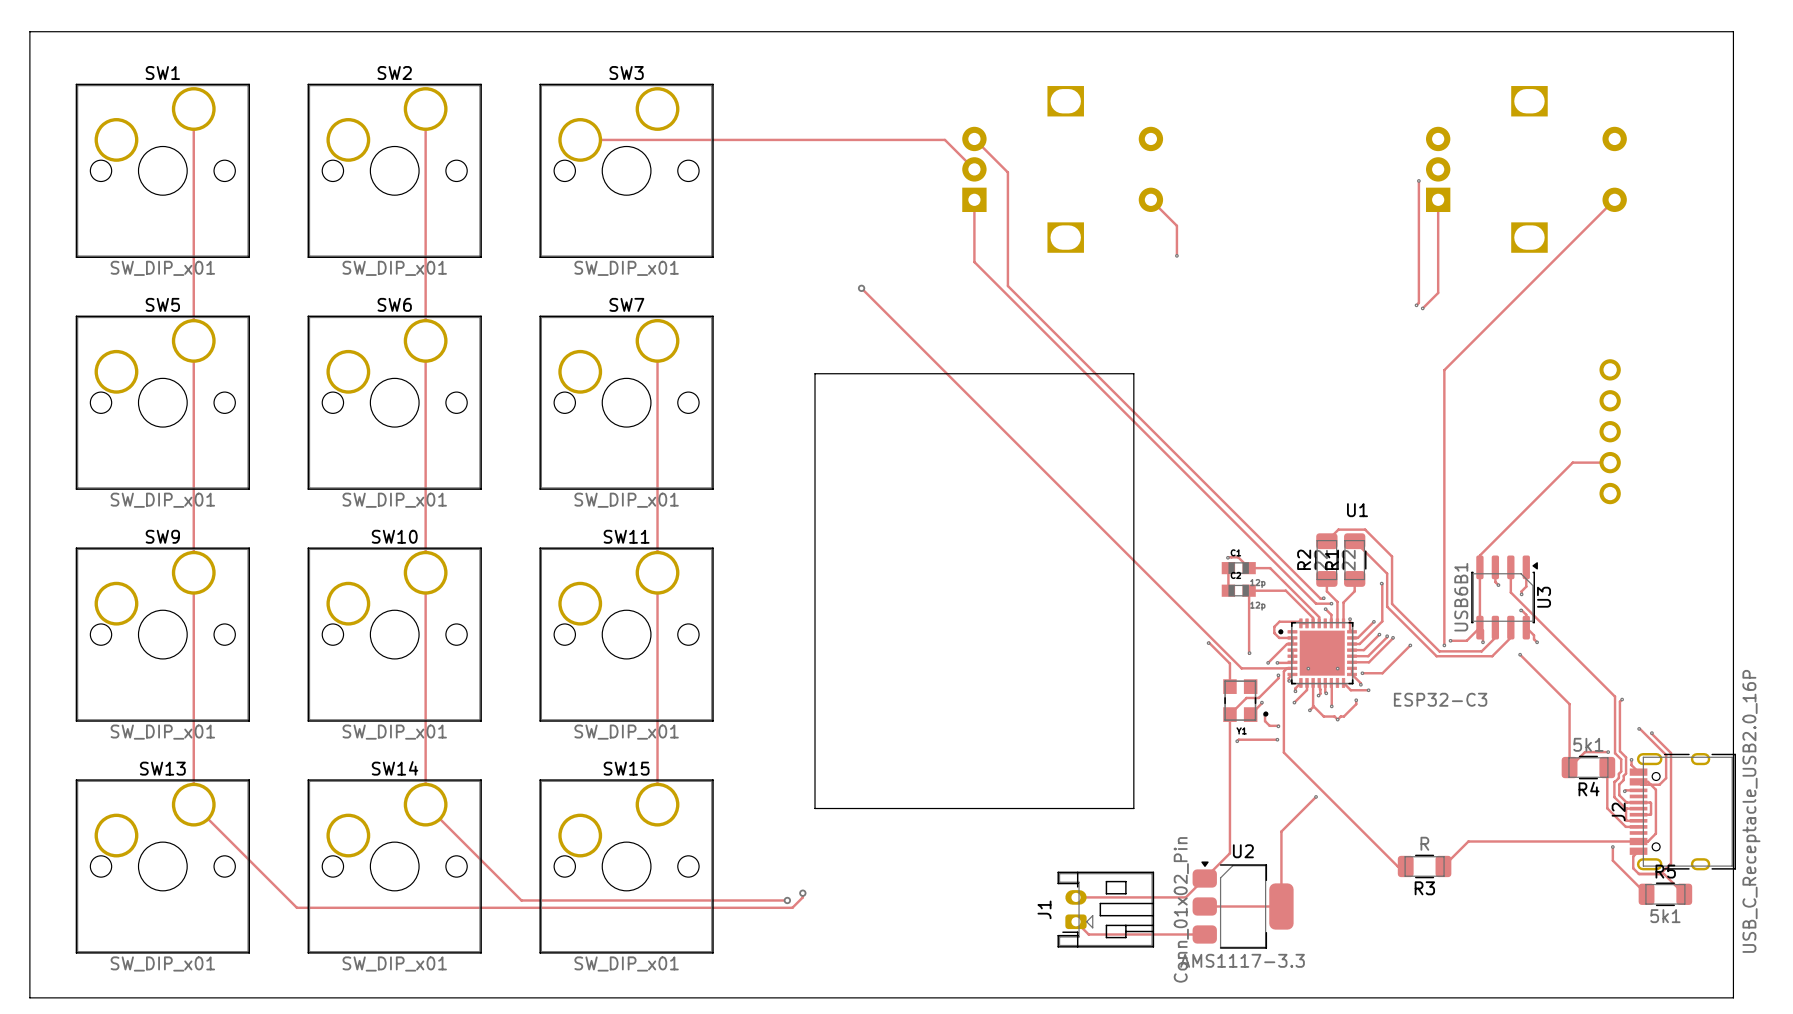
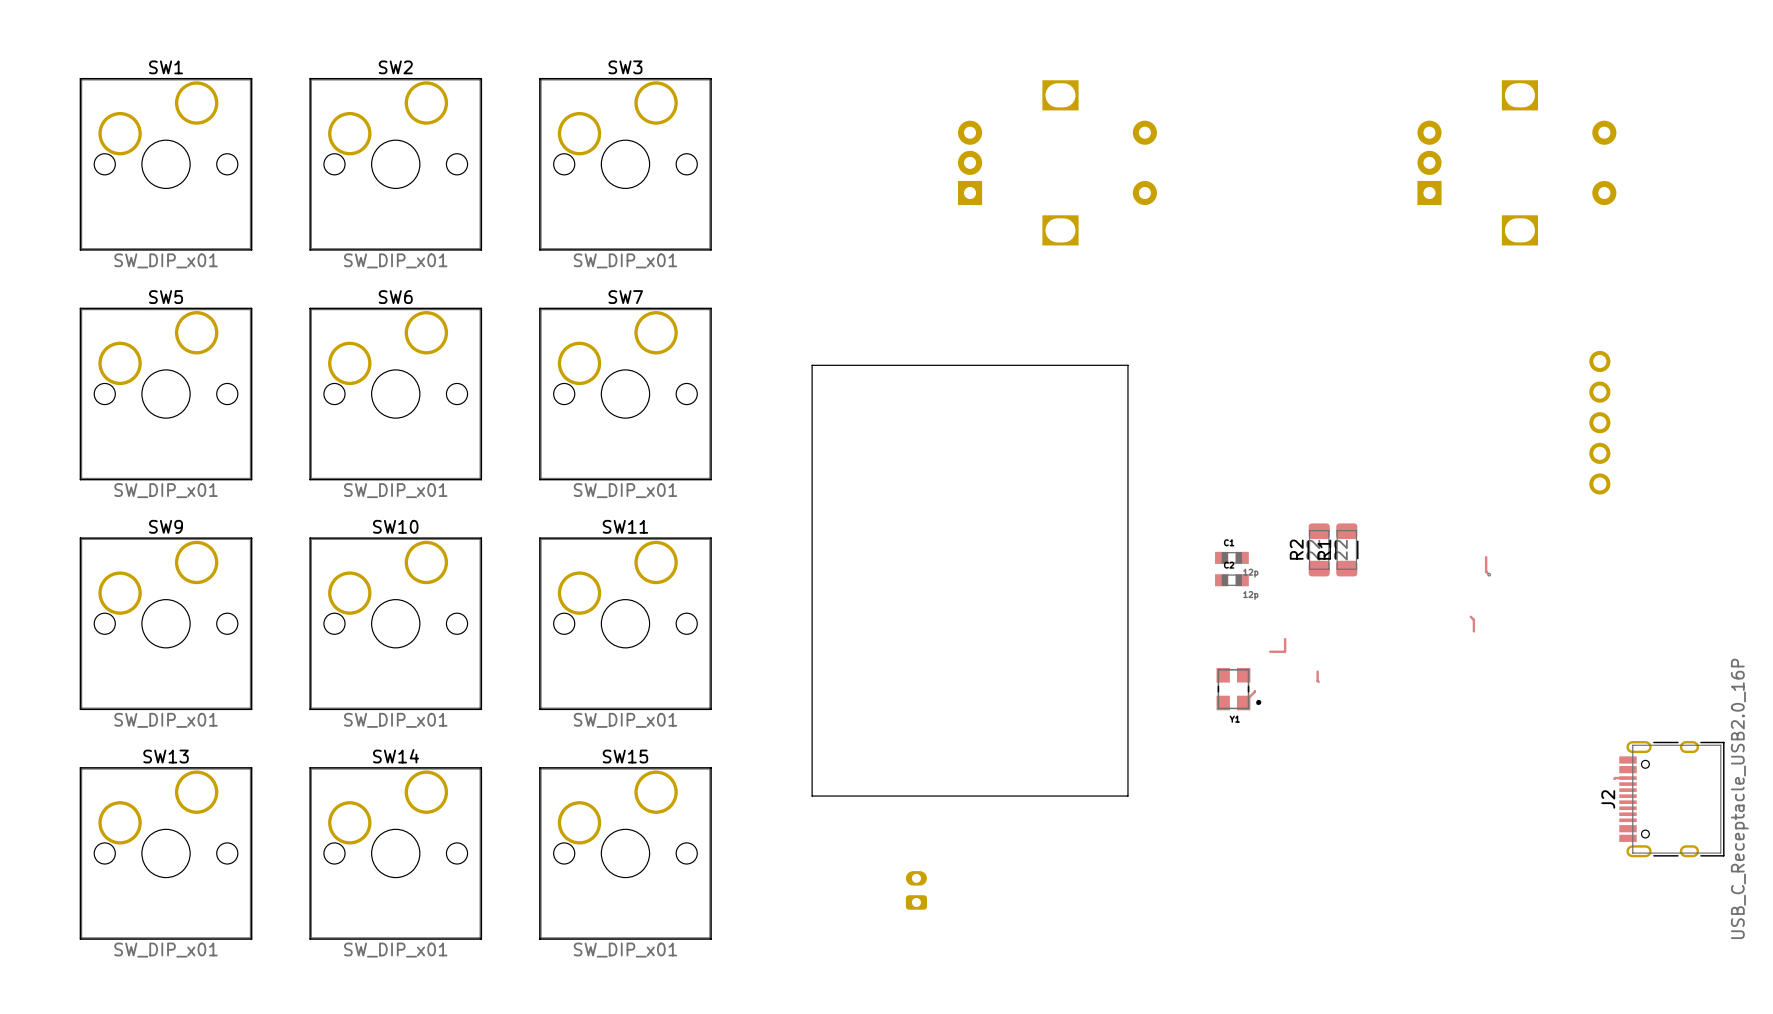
board edge: (29, 31) (29, 997) (1733, 997) (1733, 31) (29, 31) -> none
track: (193, 109) (193, 804) (296, 907) (792, 907) (802, 897) (802, 893) -> none
track: (425, 109) (425, 804) (521, 900) (787, 900) -> none
track: (974, 138) (1007, 172) (1007, 286) (1320, 598) (1323, 598) -> none
track: (580, 139) (944, 139) (974, 169) -> none
track: (1418, 180) (1418, 302) (1416, 305) -> none
via: (1418, 180) -> none
track: (974, 199) (974, 262) (1316, 603) (1331, 603) -> none
track: (1150, 199) (1176, 225) (1176, 255) -> none
track: (1438, 199) (1438, 292) (1422, 308) -> none
track: (1614, 199) (1444, 370) (1444, 645) -> none
via: (1176, 255) -> none
track: (861, 288) (1241, 668) (1292, 668) -> none
via: (861, 288) -> none
via: (1416, 305) -> none
via: (1422, 308) -> none
track: (657, 340) (657, 804) -> none
track: (1610, 462) (1572, 462) (1479, 555) (1479, 627) (1466, 640) (1450, 640) -> none
track: (1326, 541) (1338, 529) (1365, 529) (1392, 556) (1392, 603) (1439, 651) (1481, 651) (1495, 637) (1495, 627) -> none
track: (1354, 541) (1387, 573) (1387, 606) (1436, 656) (1492, 656) (1510, 637) (1510, 627) -> none
track: (1227, 557) (1238, 557) (1249, 568) (1270, 568) (1319, 617) (1319, 623) -> none
via: (1227, 557) -> none
track: (1510, 567) (1510, 592) (1615, 696) (1615, 753) (1621, 759) (1621, 771) (1618, 778) (1614, 781) (1614, 797) (1625, 808) (1638, 808) -> none
track: (1526, 567) (1526, 586) (1521, 591) (1521, 594) -> none
track: (1228, 568) (1228, 590) -> none
track: (1326, 578) (1326, 591) (1337, 601) (1337, 623) -> none
track: (1354, 578) (1354, 591) (1343, 602) (1343, 623) -> none
track: (1381, 583) (1382, 621) (1359, 644) (1351, 644) -> none
via: (1381, 583) -> none
via: (1521, 594) -> none
U3: USB6B1 (1504, 597) -> none
via: (1323, 598) -> none
via: (1331, 603) -> none
track: (1325, 609) (1331, 614) (1331, 623) -> none
via: (1325, 609) -> none
track: (1521, 610) (1526, 614) (1526, 627) (1534, 635) (1534, 639) (1537, 642) -> none
via: (1521, 610) -> none
track: (1350, 619) (1350, 629) (1351, 631) -> none
via: (1350, 619) -> none
track: (1373, 621) (1357, 637) (1351, 637) -> none
via: (1373, 621) -> none
track: (1307, 623) (1279, 621) (1274, 626) (1274, 633) (1279, 637) (1292, 637) (1292, 644) (1287, 644) (1268, 662) -> none
track: (1313, 623) (1313, 617) (1285, 590) (1249, 590) (1249, 653) -> none
track: (1379, 634) (1363, 650) (1351, 650) -> none
via: (1379, 634) -> none
track: (1387, 636) (1368, 656) (1351, 656) -> none
via: (1387, 636) -> none
track: (1393, 637) (1369, 662) (1351, 662) -> none
via: (1393, 637) -> none
via: (1450, 640) -> none
via: (1482, 642) -> none
via: (1537, 642) -> none
track: (1208, 643) (1229, 663) (1229, 686) (1231, 685) -> none
via: (1208, 643) -> none
track: (1410, 645) (1382, 673) (1362, 673) -> none
via: (1410, 645) -> none
via: (1444, 645) -> none
via: (1249, 653) -> none
U1: ESP32-C3 (1317, 653) -> none
track: (1520, 654) (1569, 704) (1569, 767) (1585, 752) (1608, 752) -> none
via: (1520, 654) -> none
via: (1268, 662) -> none
via: (1277, 662) -> none
track: (1287, 668) (1283, 671) (1283, 752) (1397, 866) (1405, 866) -> none
via: (1308, 668) -> none
via: (1337, 668) -> none
track: (1351, 668) (1351, 674) (1360, 684) -> none
via: (1362, 673) -> none
track: (1292, 674) (1288, 678) (1289, 680) -> none
track: (1278, 675) (1278, 678) (1258, 697) (1246, 697) (1229, 714) (1229, 853) (1185, 897) (1075, 897) -> none
via: (1278, 675) -> none
via: (1289, 680) -> none
track: (1300, 682) (1295, 688) (1295, 691) -> none
track: (1307, 682) (1307, 690) (1294, 702) -> none
track: (1313, 682) (1313, 707) (1309, 710) -> none
track: (1319, 682) (1320, 693) (1318, 695) -> none
track: (1331, 682) (1331, 706) -> none
track: (1343, 682) (1350, 690) (1368, 690) -> none
via: (1360, 684) -> none
via: (1368, 690) -> none
via: (1295, 691) -> none
via: (1326, 693) -> none
via: (1318, 695) -> none
track: (1622, 699) (1619, 701) (1619, 751) (1626, 757) (1626, 773) (1619, 784) (1619, 795) (1626, 802) (1651, 803) (1650, 814) (1638, 814) -> none
via: (1622, 699) -> none
track: (1356, 700) (1356, 704) (1343, 716) (1337, 719) (1334, 716) (1323, 716) (1313, 705) -> none
via: (1356, 700) -> none
via: (1261, 702) -> none
via: (1294, 702) -> none
via: (1331, 706) -> none
via: (1309, 710) -> none
track: (1265, 714) (1265, 721) (1269, 725) (1278, 726) -> none
via: (1337, 719) -> none
via: (1278, 726) -> none
track: (1639, 728) (1666, 755) (1666, 778) (1659, 784) (1641, 784) (1638, 781) (1648, 781) (1655, 789) (1655, 833) (1648, 841) (1468, 841) (1443, 866) -> none
via: (1639, 728) -> none
track: (1651, 733) (1671, 753) (1671, 863) (1660, 874) -> none
via: (1651, 733) -> none
track: (1277, 739) (1237, 741) -> none
via: (1277, 739) -> none
via: (1237, 741) -> none
via: (1608, 752) -> none
track: (1631, 759) (1631, 765) (1638, 772) -> none
via: (1631, 759) -> none
R4: 5k1 (1588, 767) -> none
track: (1607, 767) (1607, 808) (1625, 826) (1638, 826) -> none
via: (1624, 791) -> none
track: (1316, 796) (1281, 831) (1281, 906) (1204, 906) -> none
via: (1316, 796) -> none
track: (1626, 808) (1626, 820) (1638, 820) -> none
track: (1612, 846) (1612, 860) (1646, 894) -> none
via: (1612, 846) -> none
track: (1638, 851) (1633, 856) (1633, 868) (1638, 874) (1663, 874) (1684, 894) -> none
R3: R (1424, 866) -> none
via: (802, 893) -> none
R5: 5k1 (1665, 894) -> none
via: (787, 900) -> none
U2: AMS1117-3.3 (1243, 905) -> none
J1 side: top (1105, 909) -> bottom (916, 890)
track: (1075, 921) (1088, 934) (1204, 934) -> none

